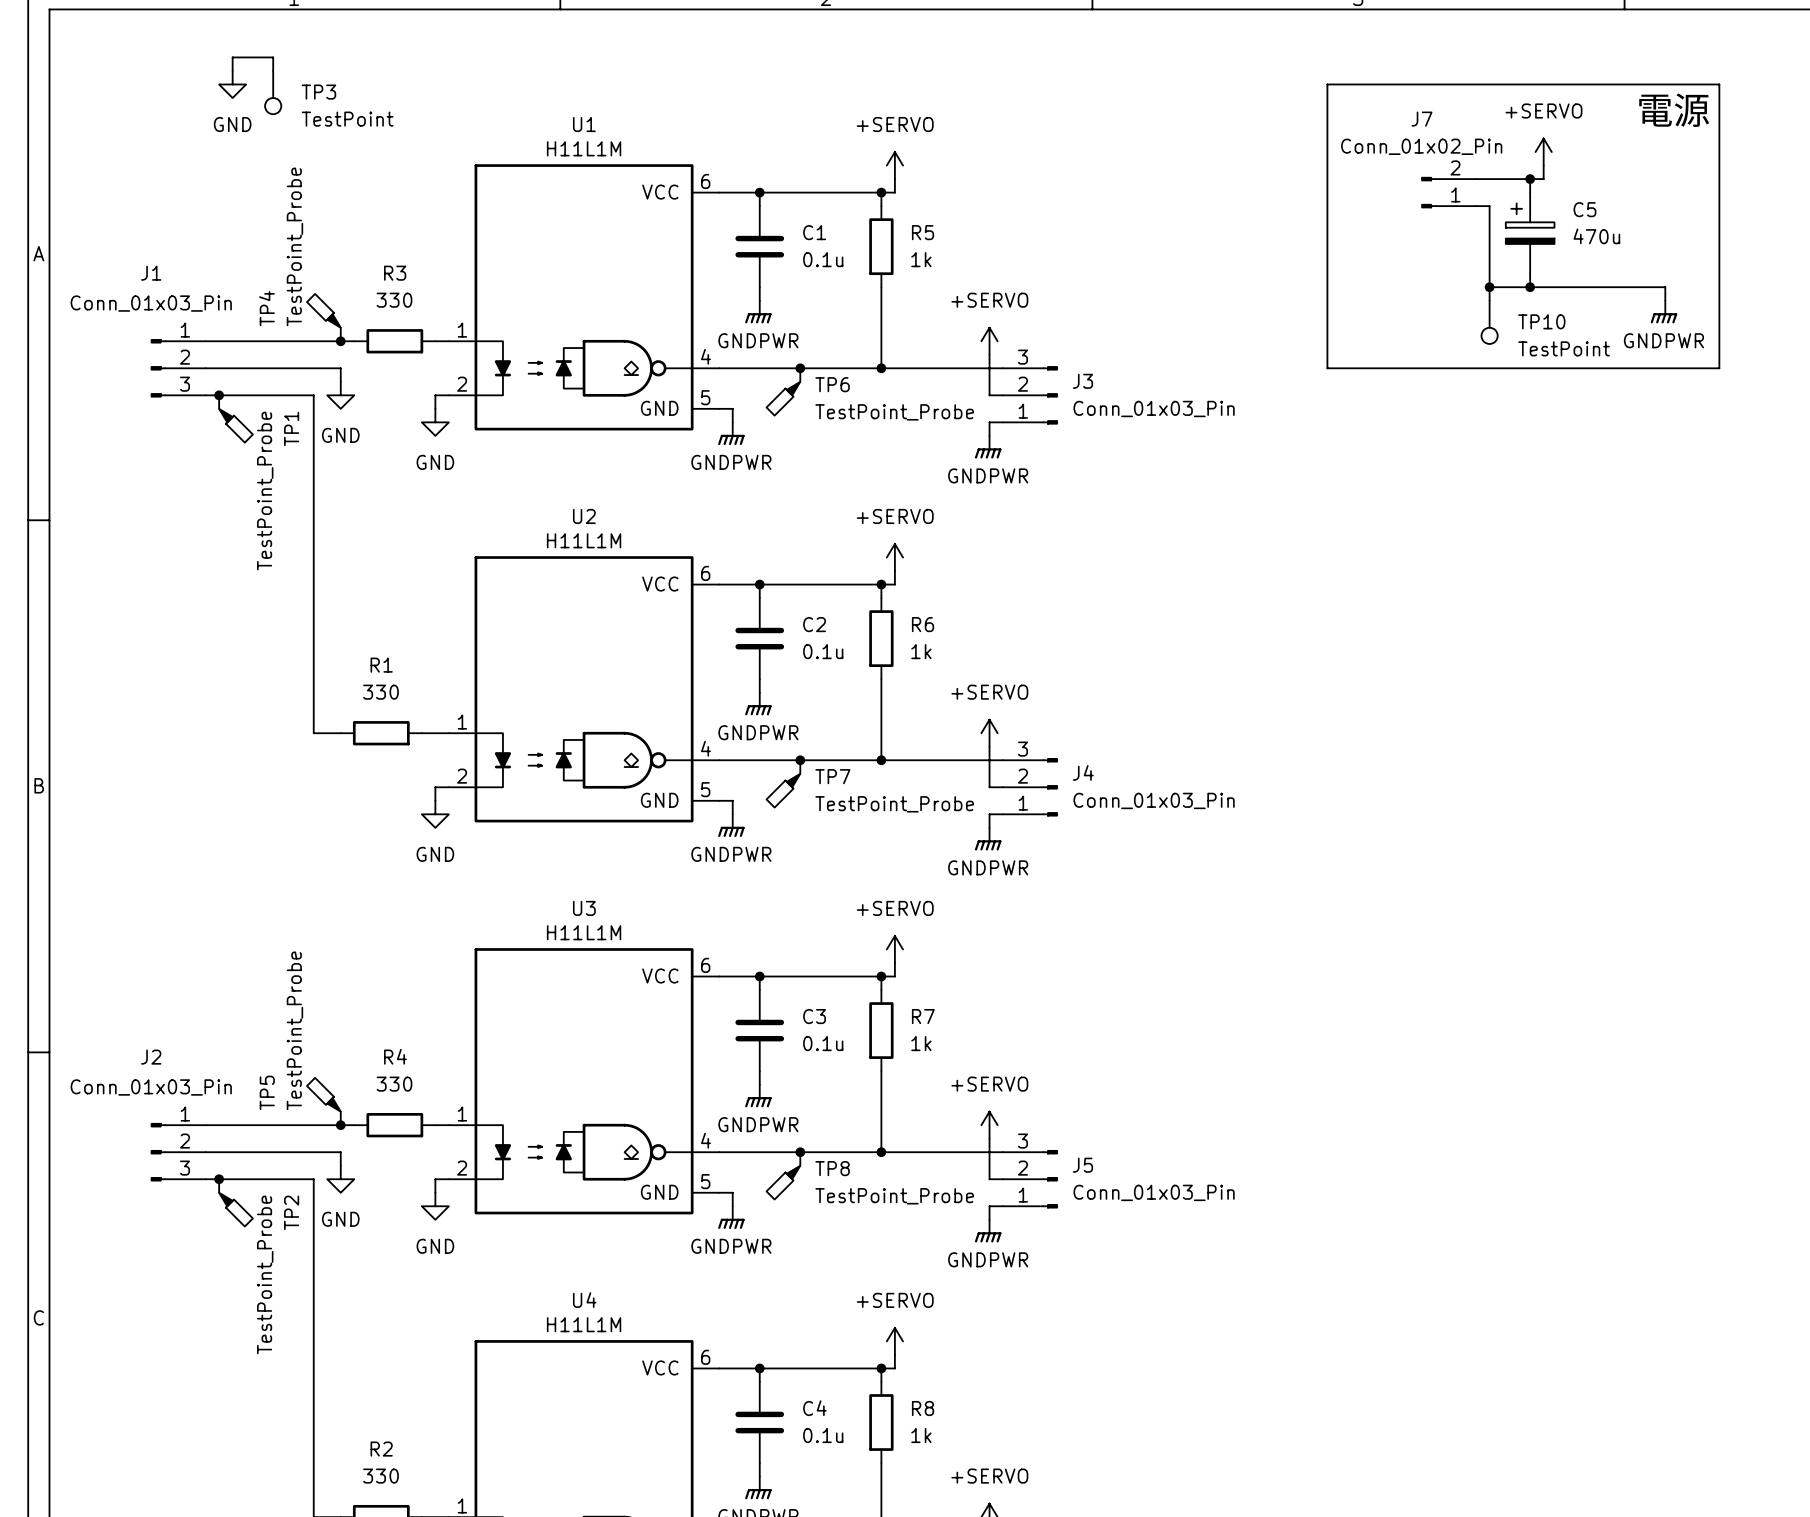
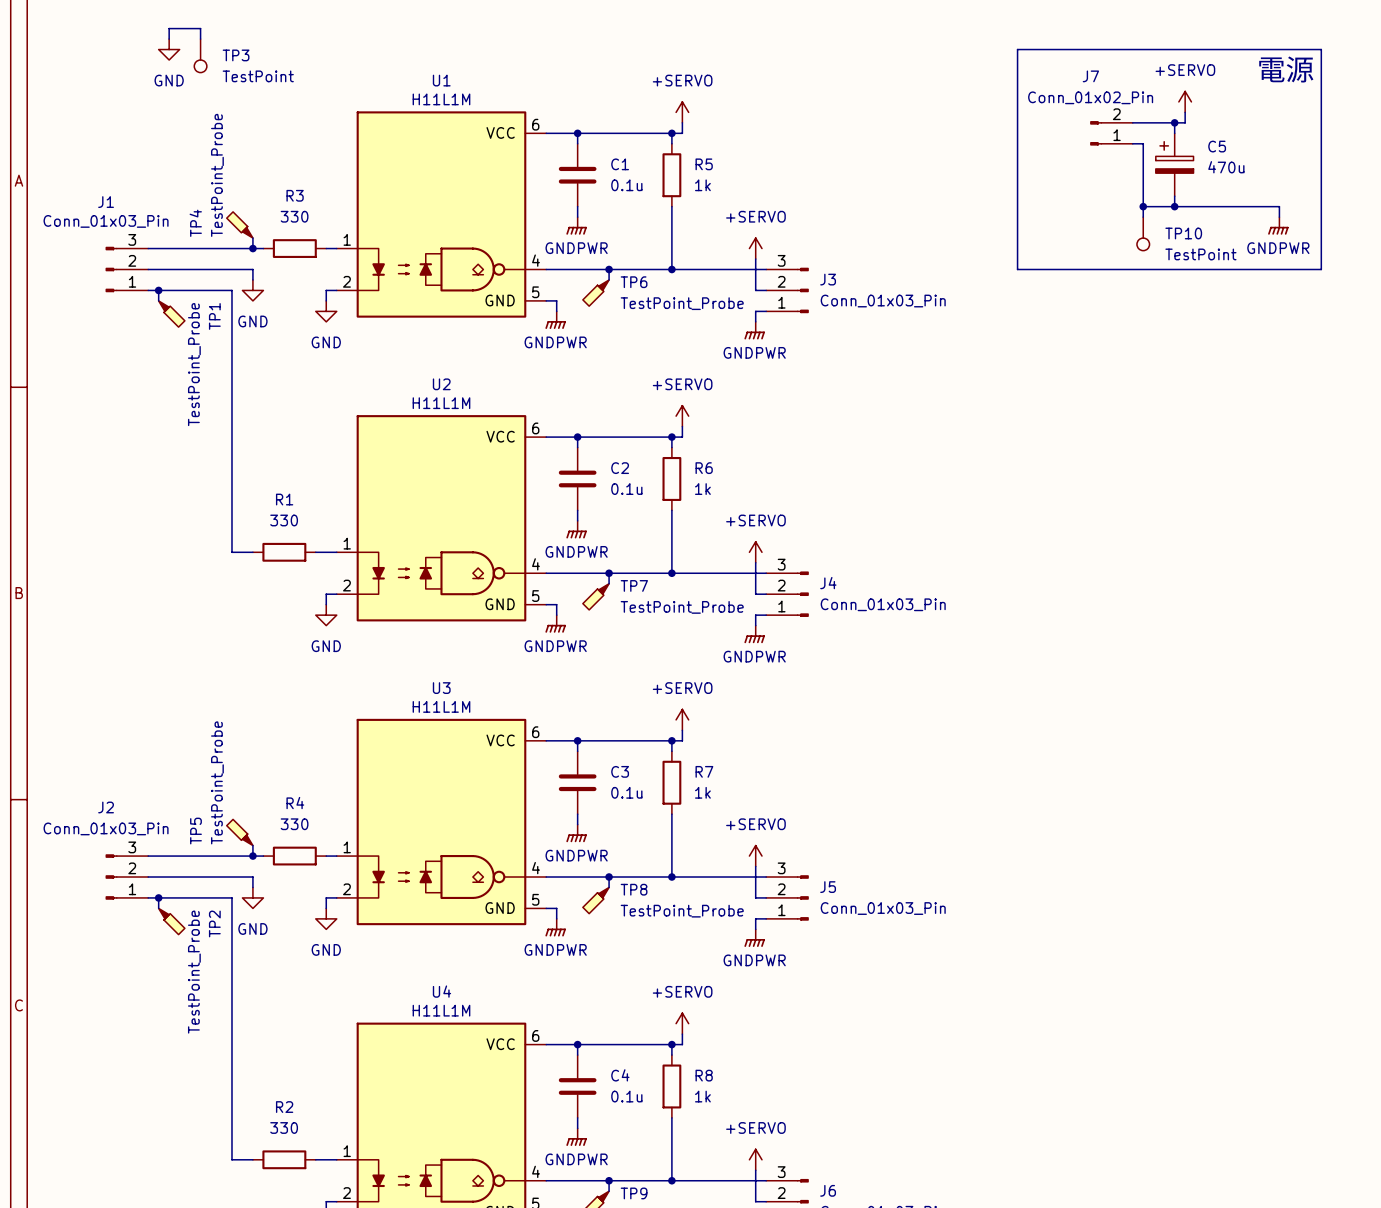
J1 flip: as is (158, 368) -> up-down (111, 269)
J2 flip: as is (158, 1152) -> up-down (111, 877)

